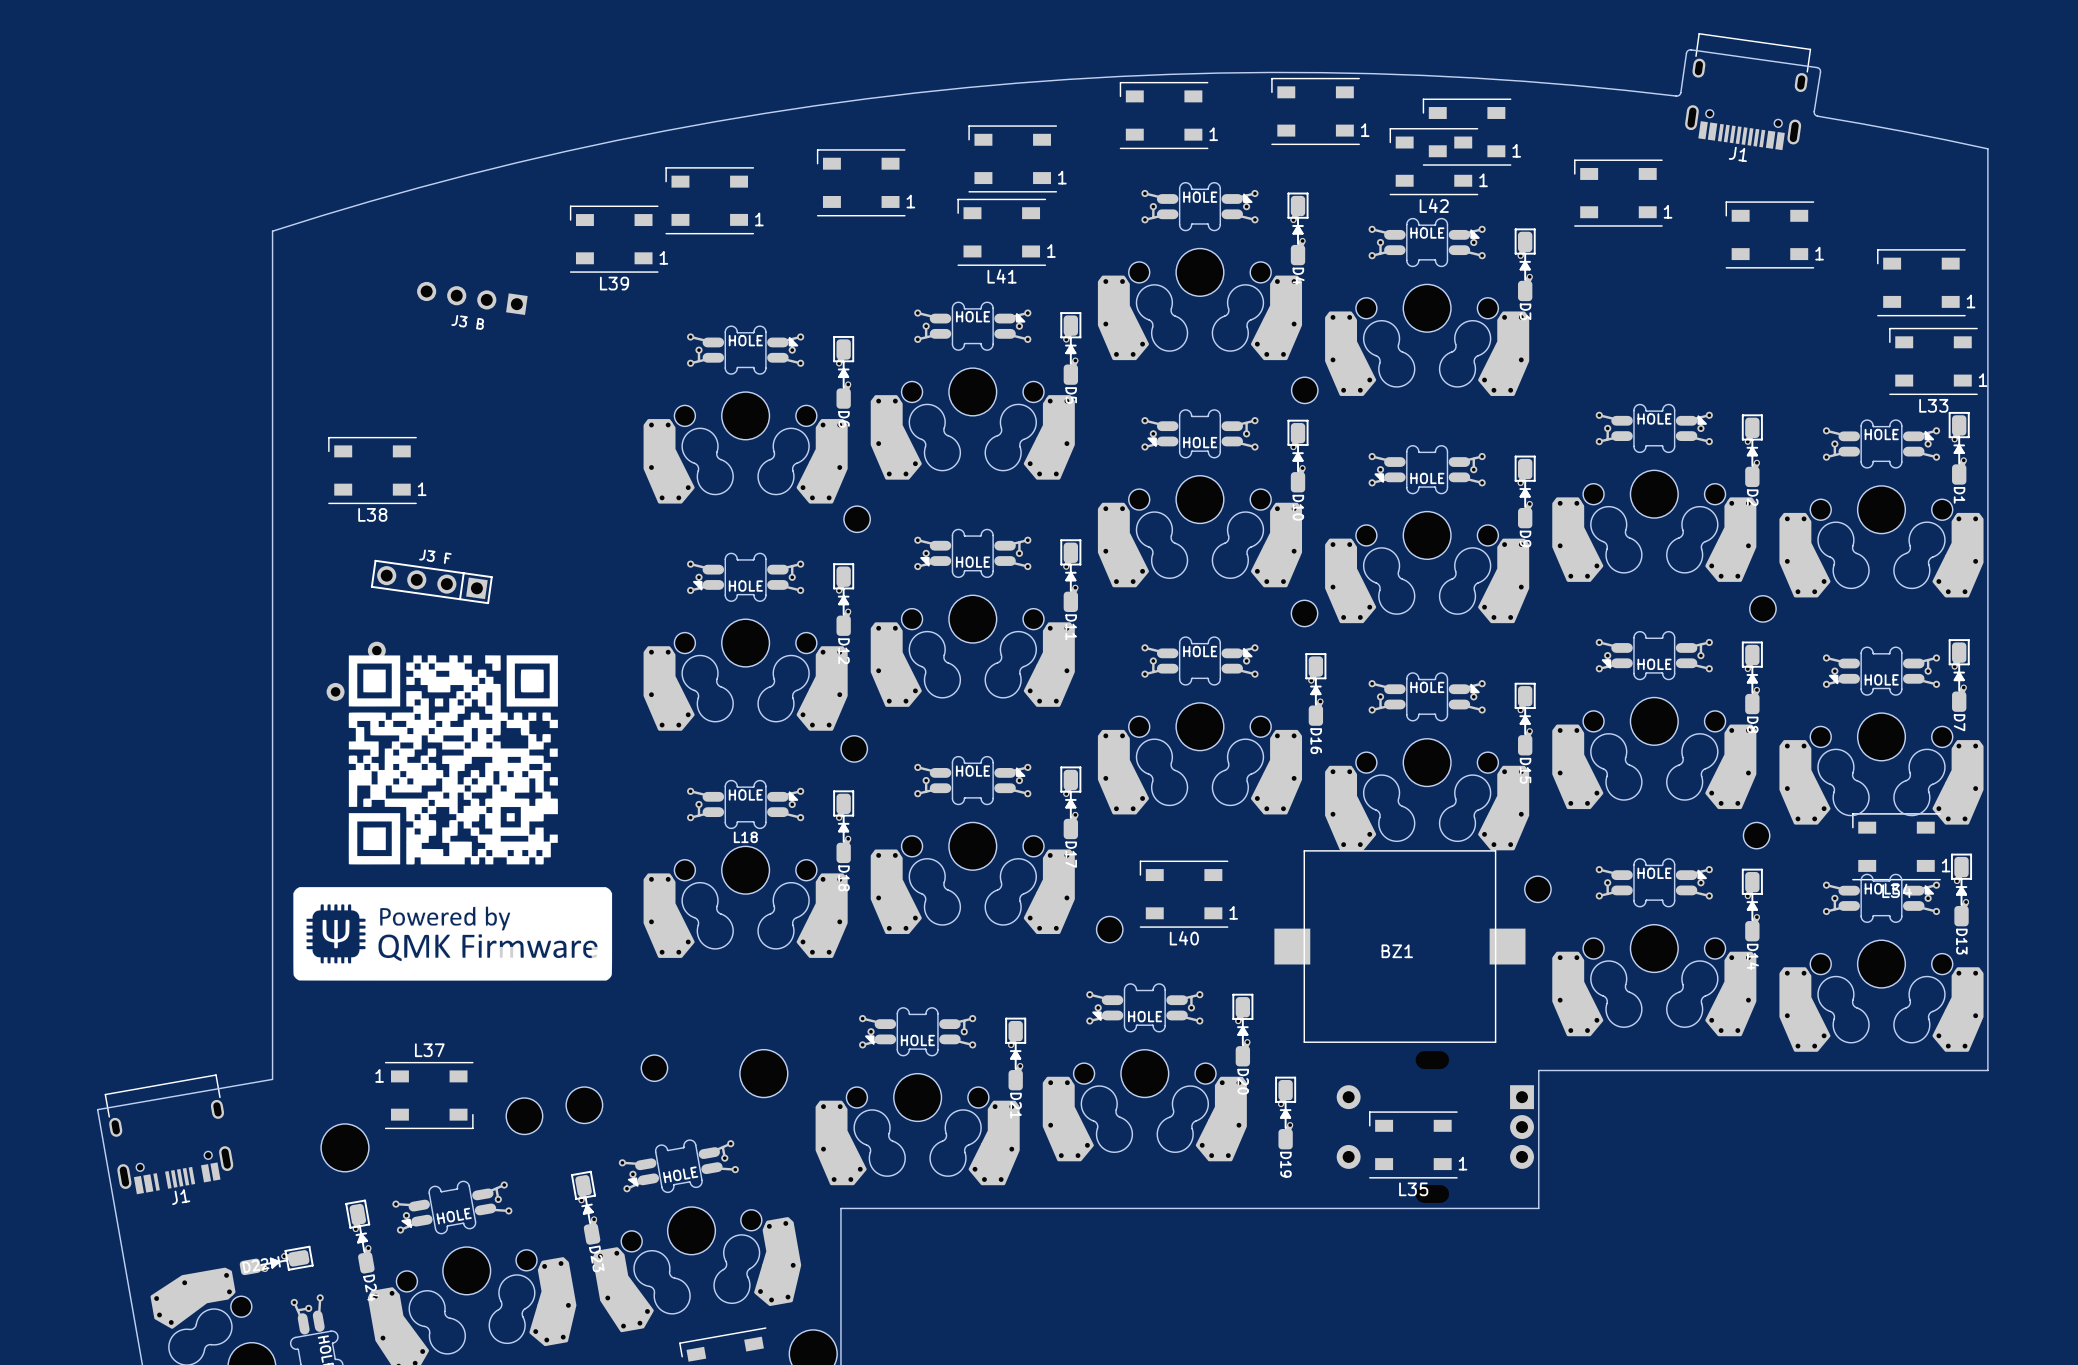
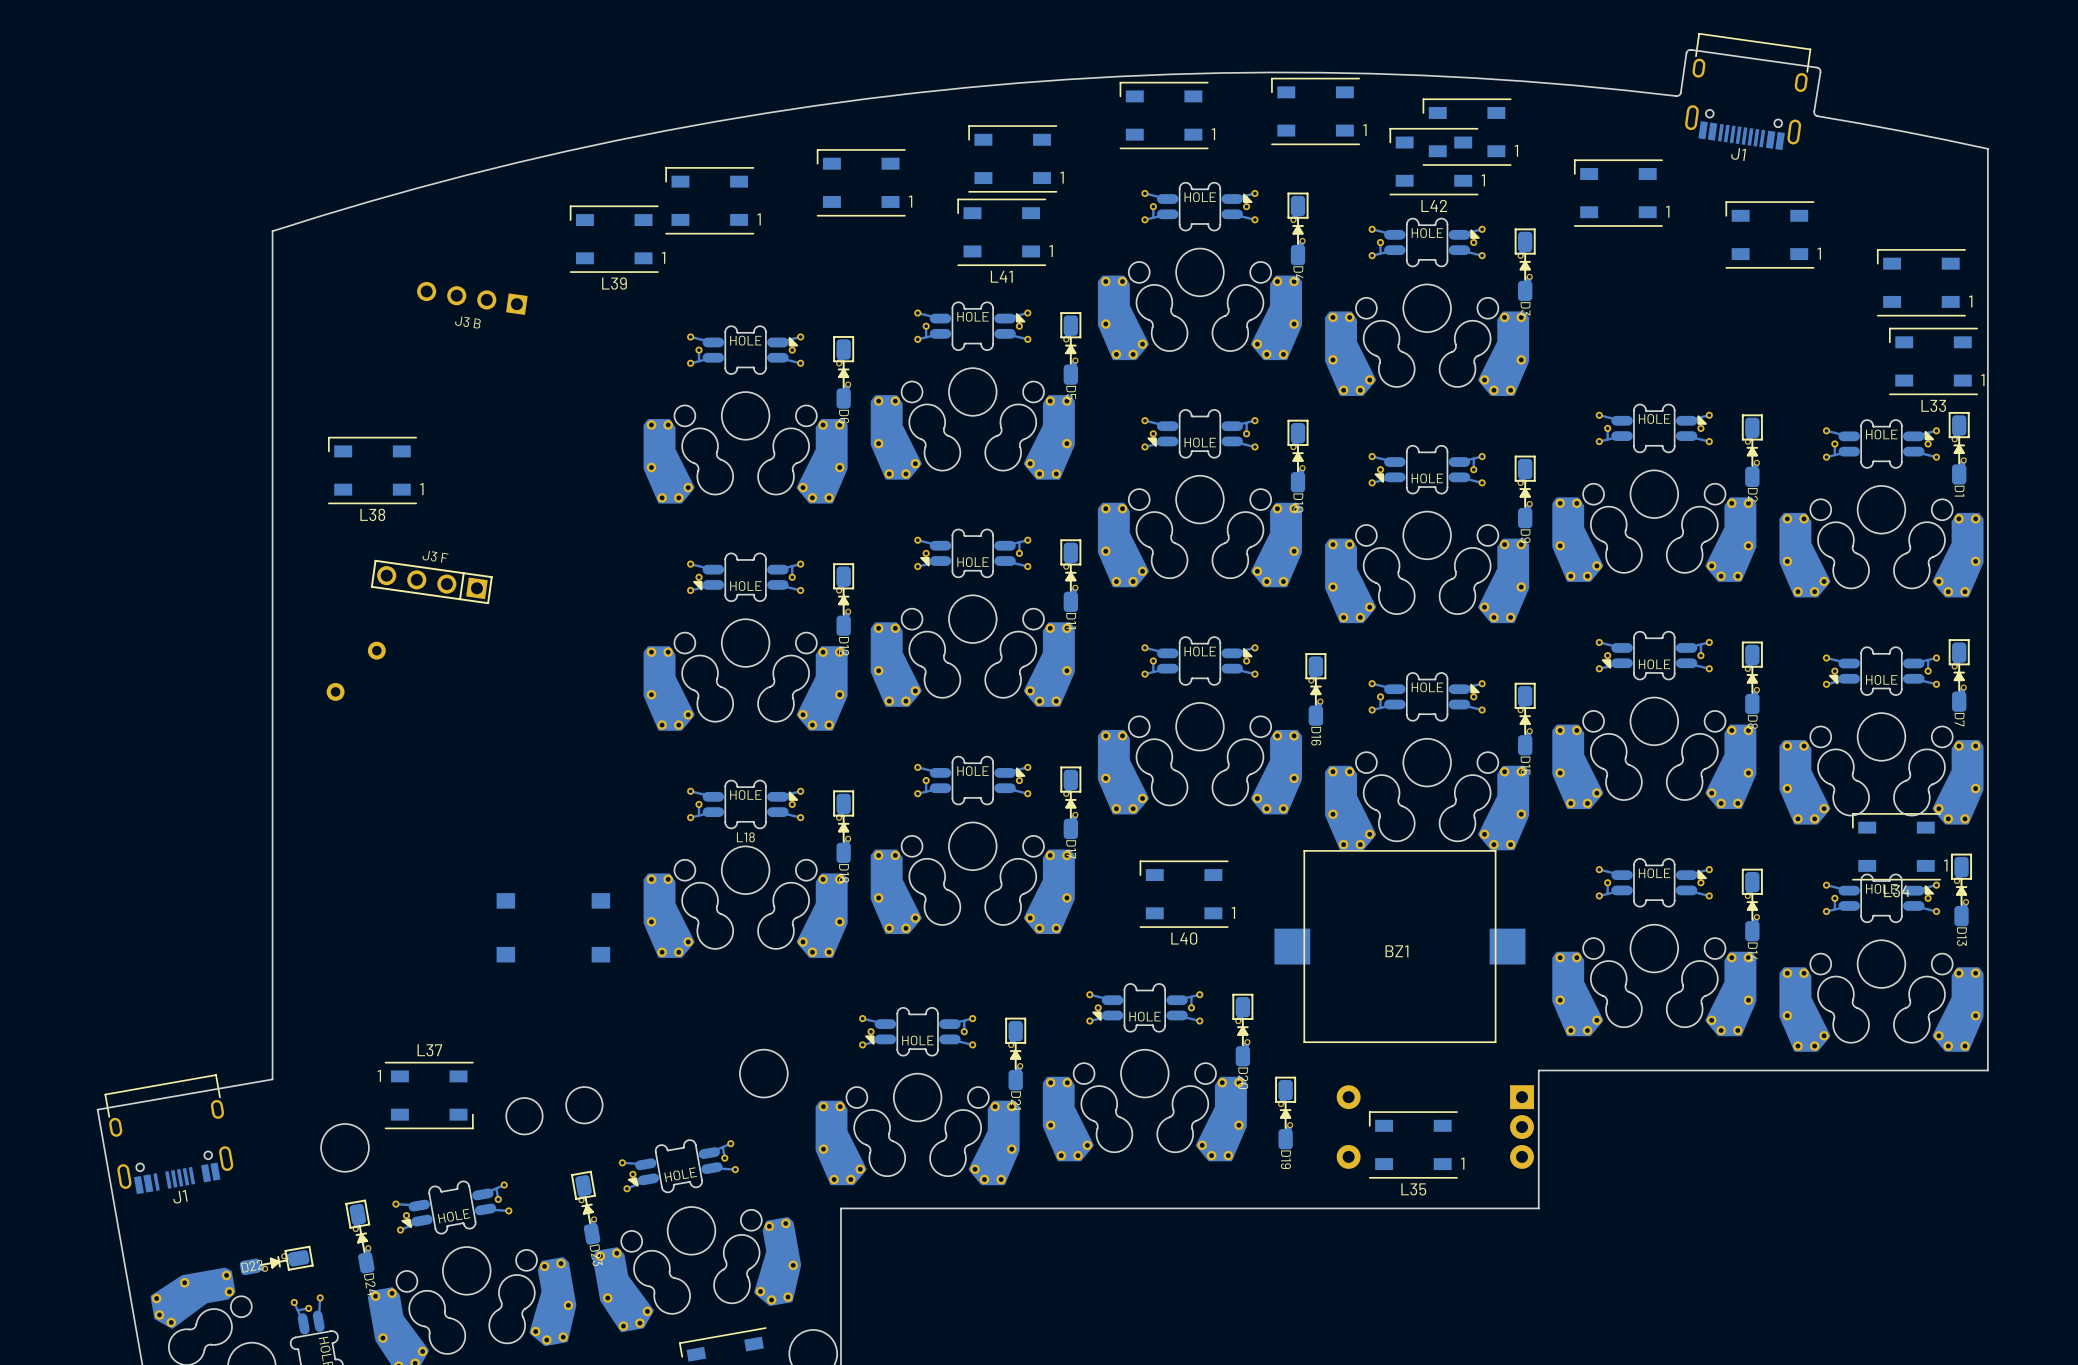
part: (1304, 390) -> none
part: (857, 519) -> none
part: (1762, 608) -> none
part: (1304, 613) -> none
drawing: [348, 655, 558, 865] -> none
part: (854, 748) -> none
part: (1756, 835) -> none
drawing: [293, 887, 613, 981] -> none
part: (1537, 889) -> none
part: (1109, 929) -> none
part: (654, 1068) -> none

